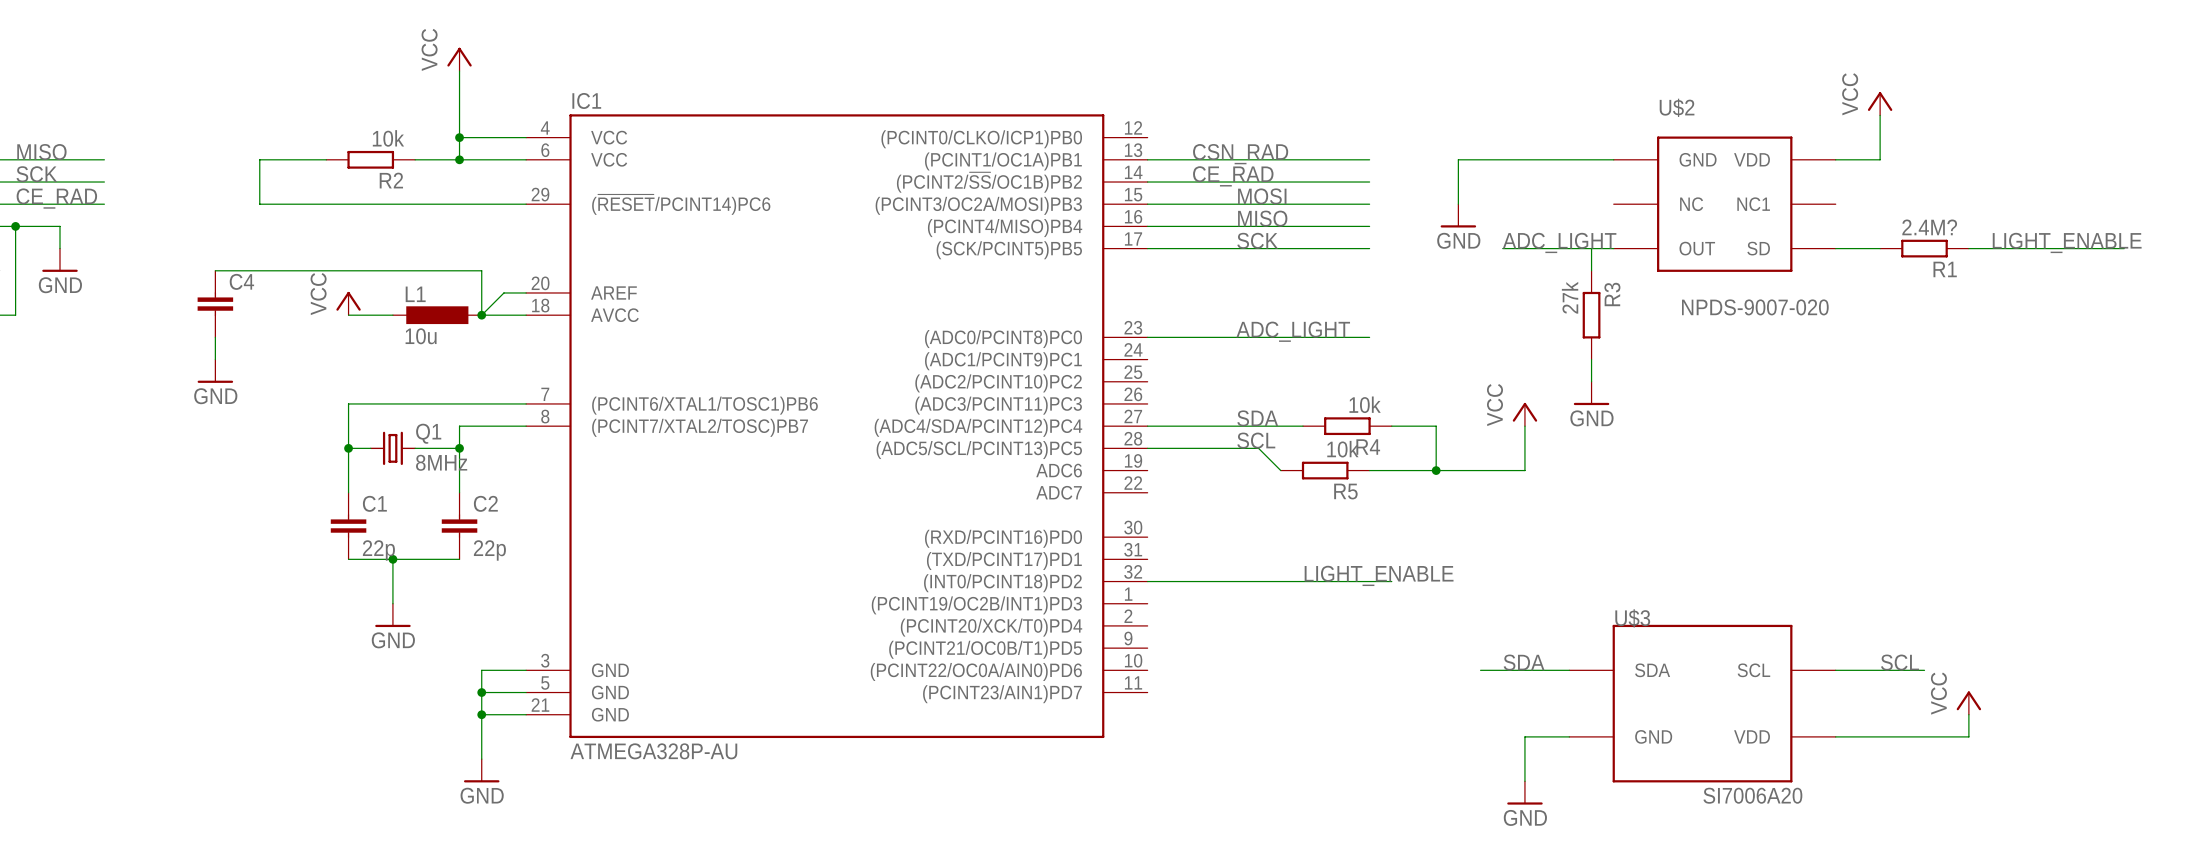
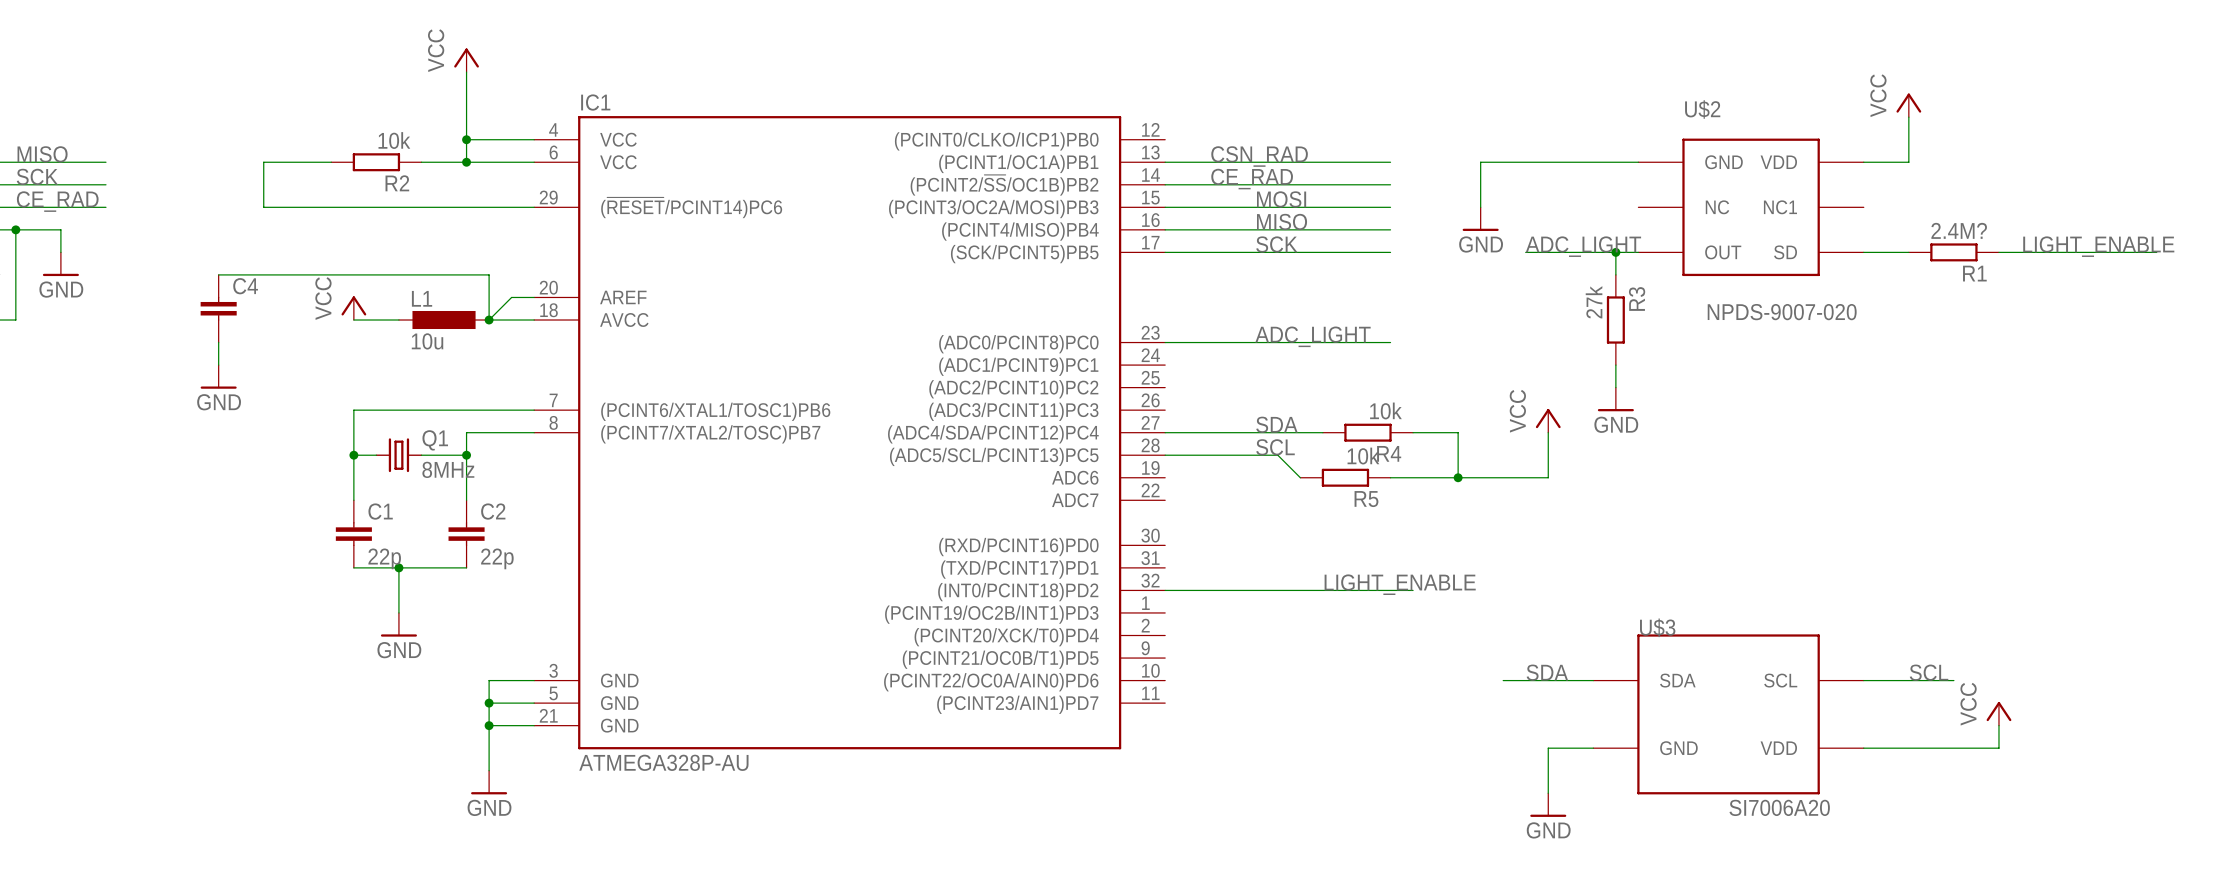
junction: none -> (1615, 252)

